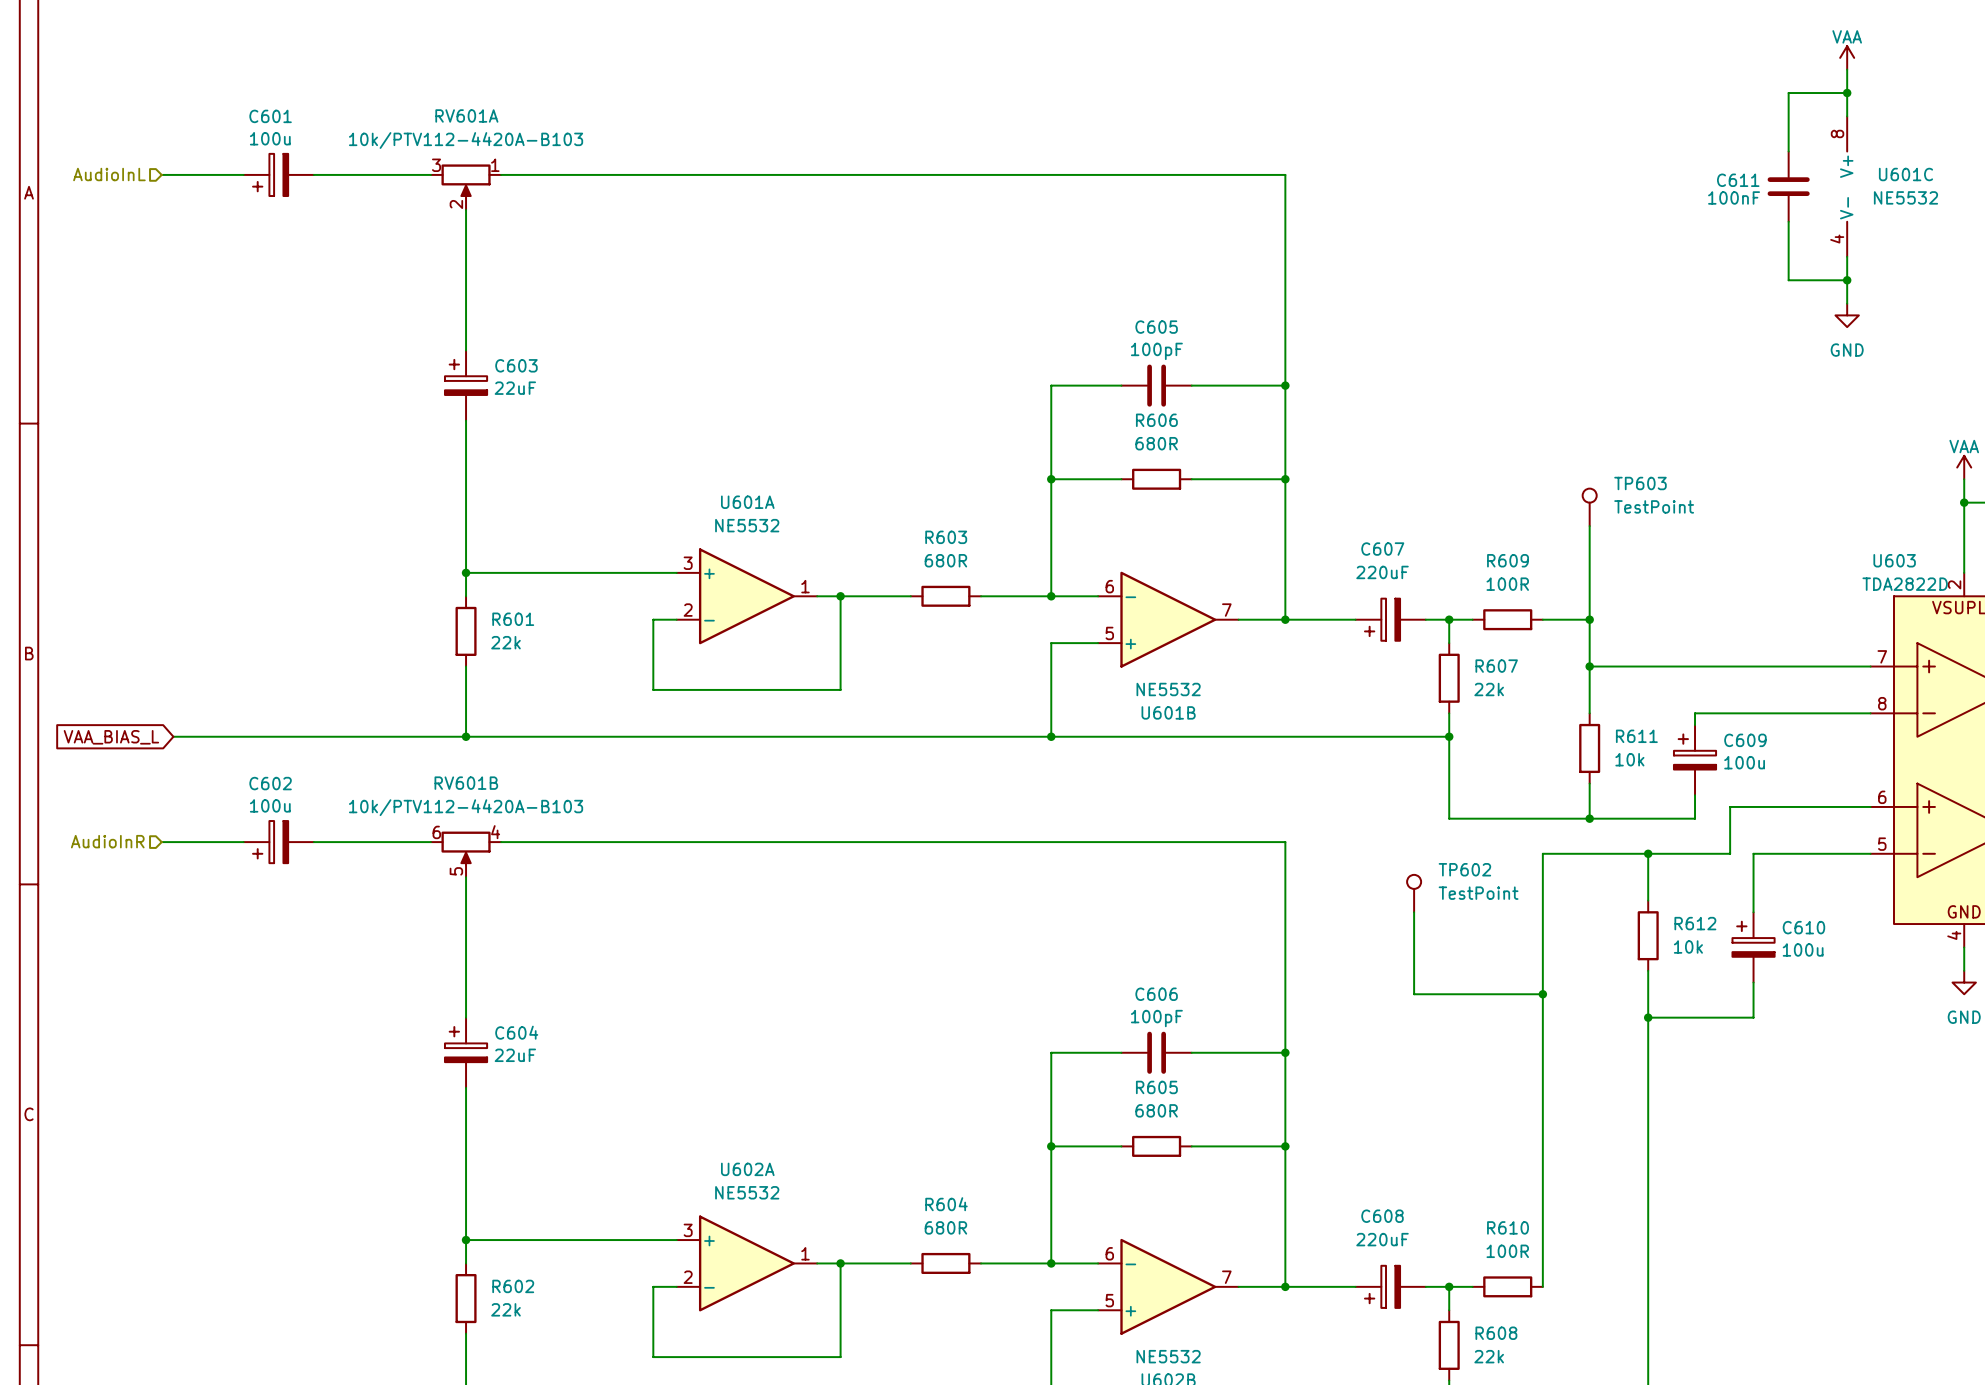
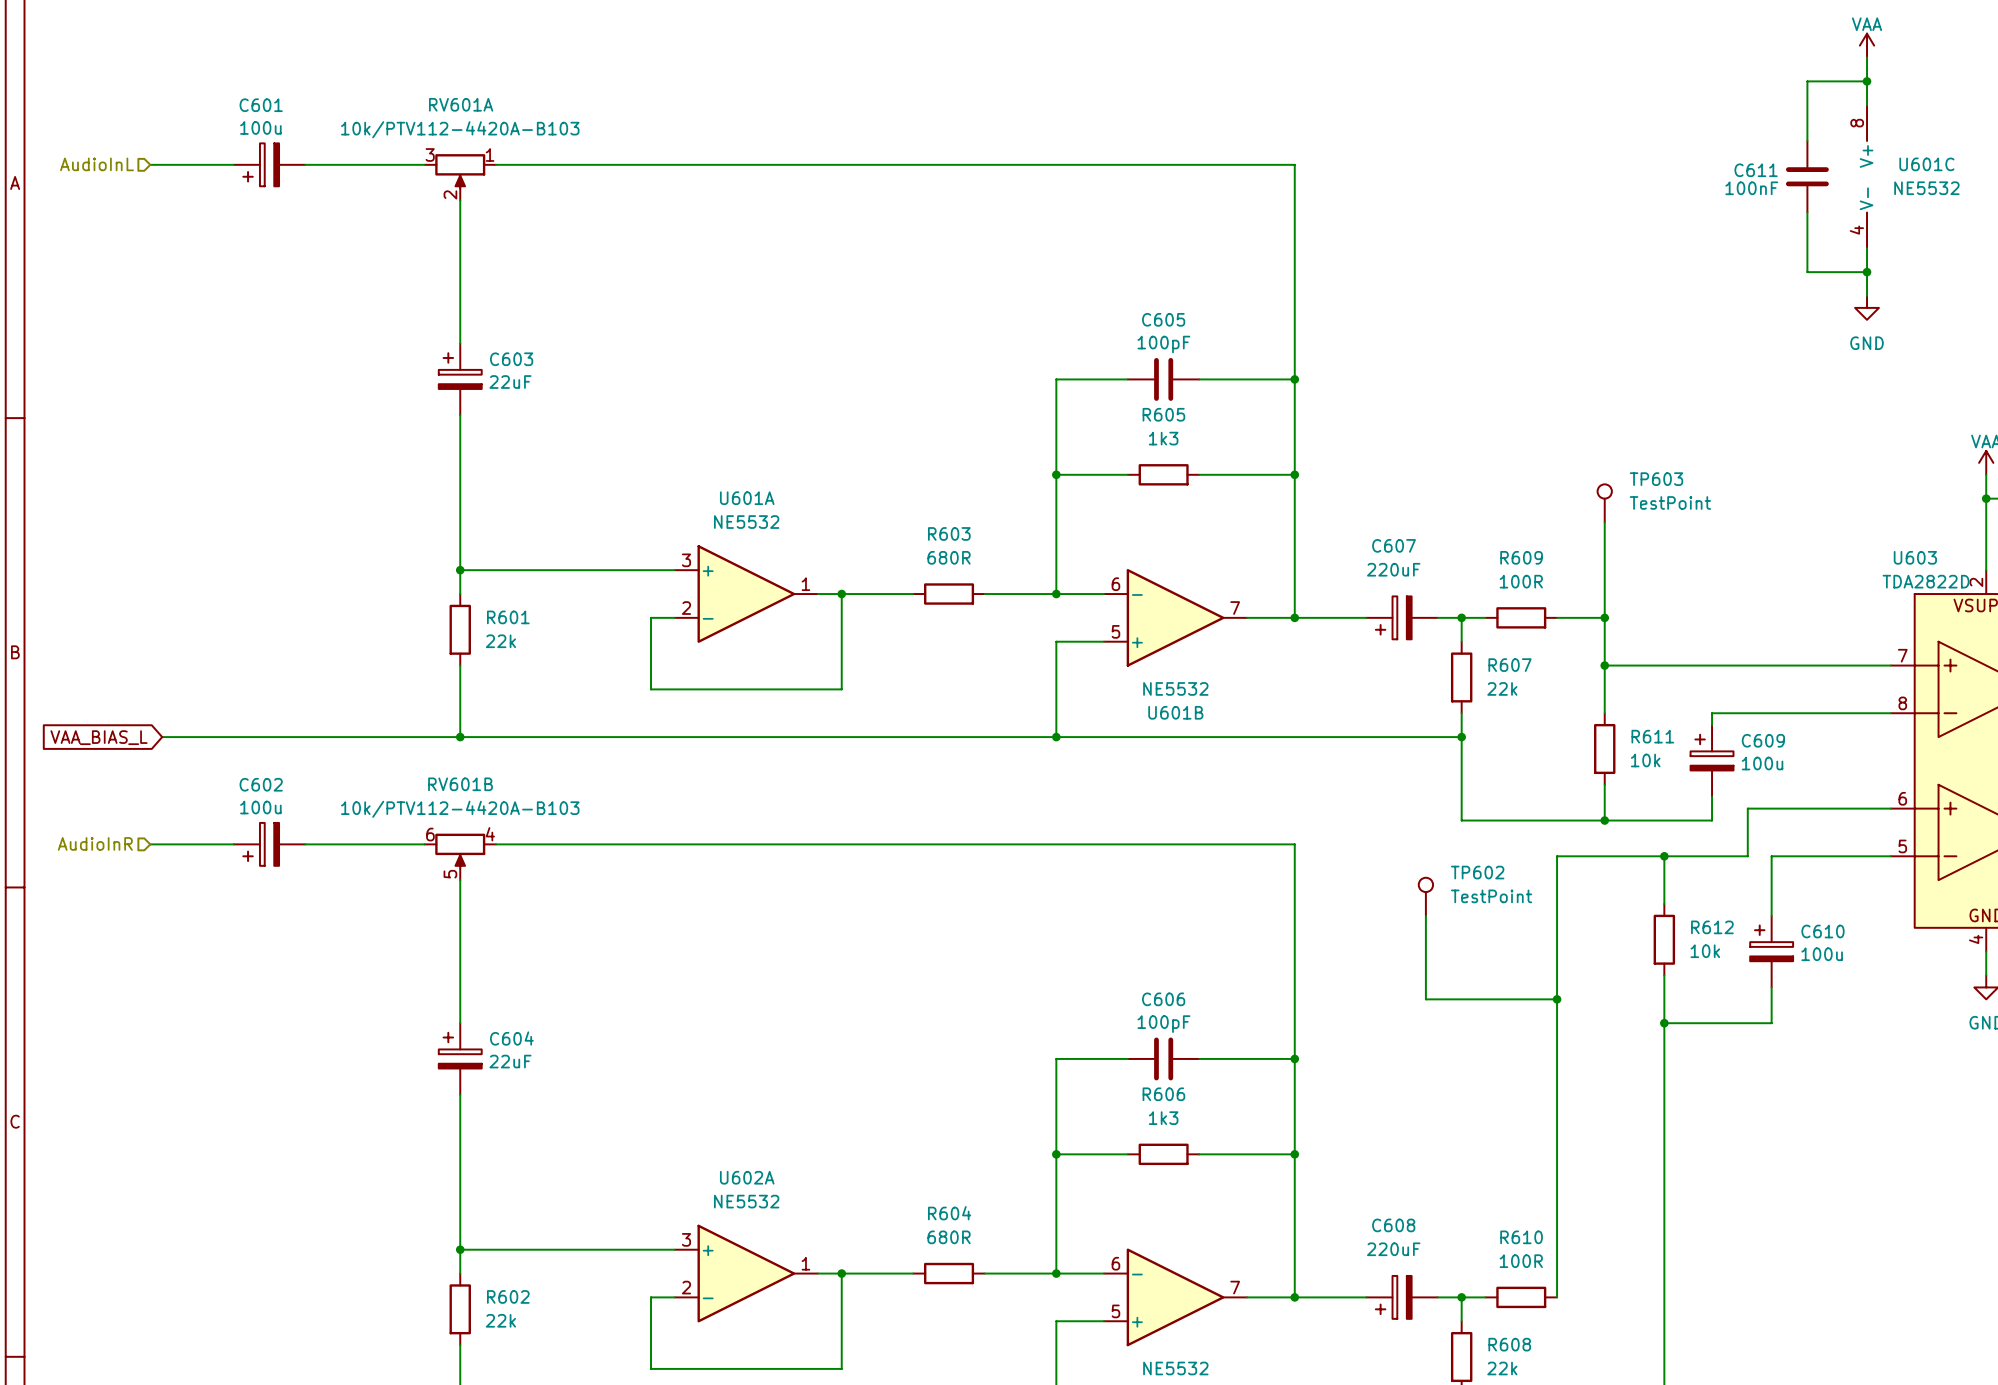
R606 name: R606 (1156, 420) -> R605 (1163, 414)
R606 value: 680R (1156, 443) -> 1k3 (1163, 438)
R605 name: R605 (1156, 1087) -> R606 (1163, 1094)
R605 value: 680R (1156, 1110) -> 1k3 (1163, 1118)

